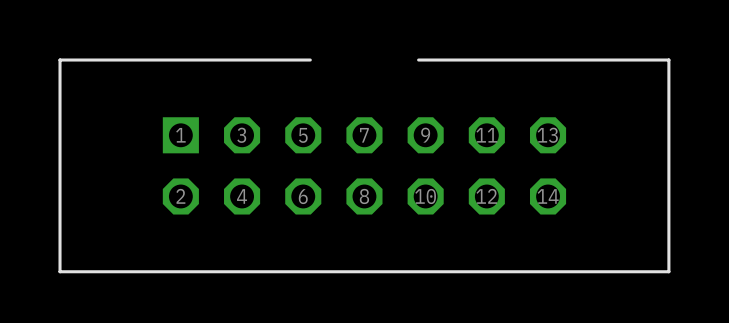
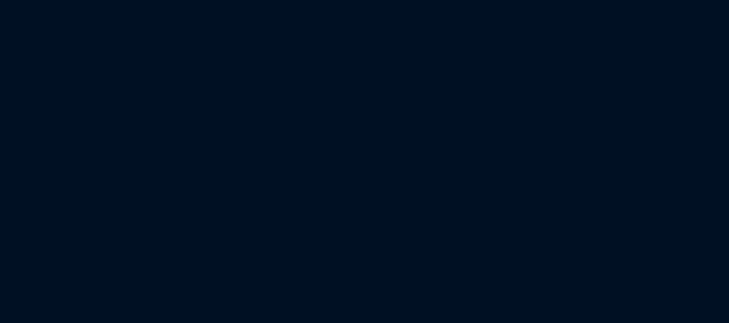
part: (364, 165) -> none

